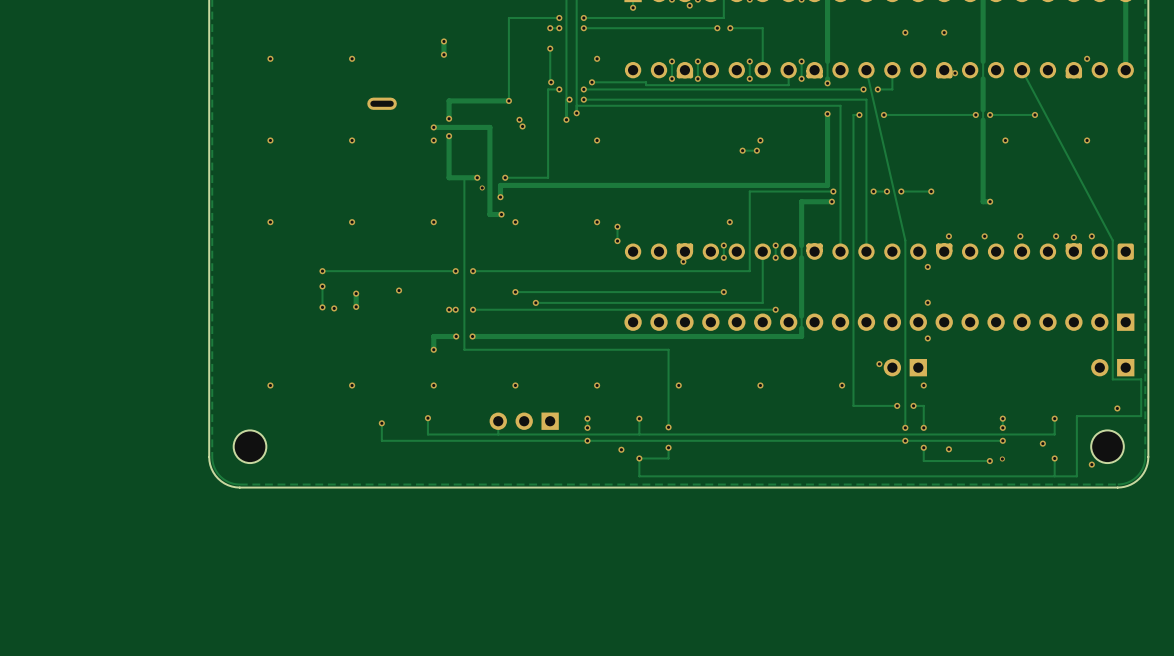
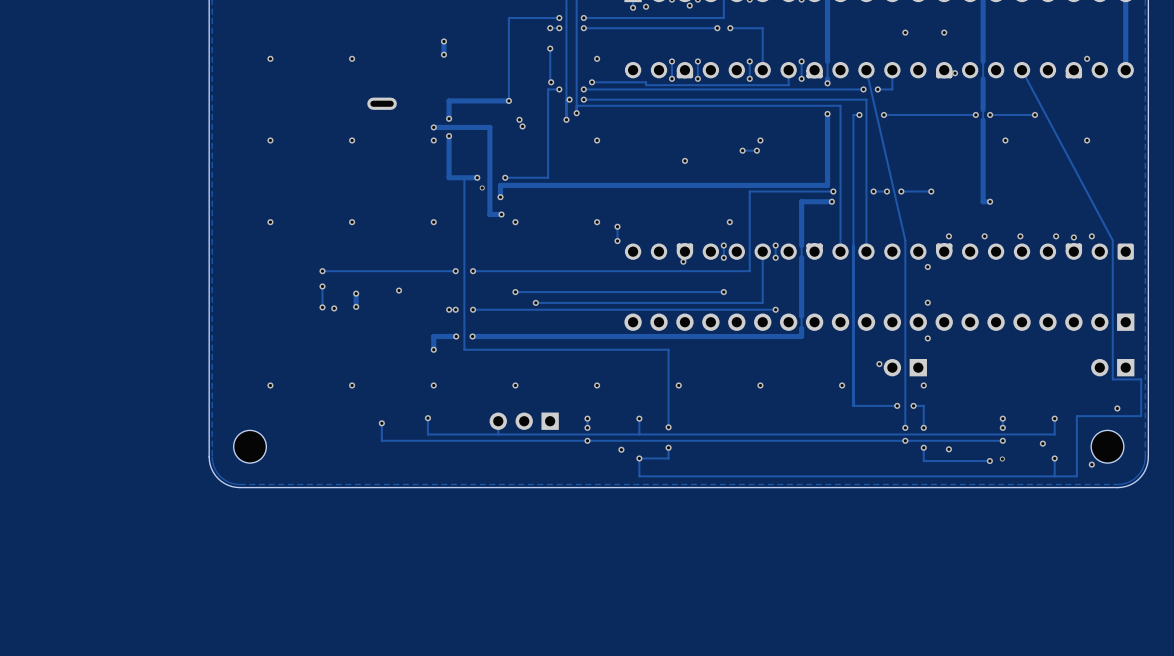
via: none -> (646, 6)
via: none -> (684, 160)

